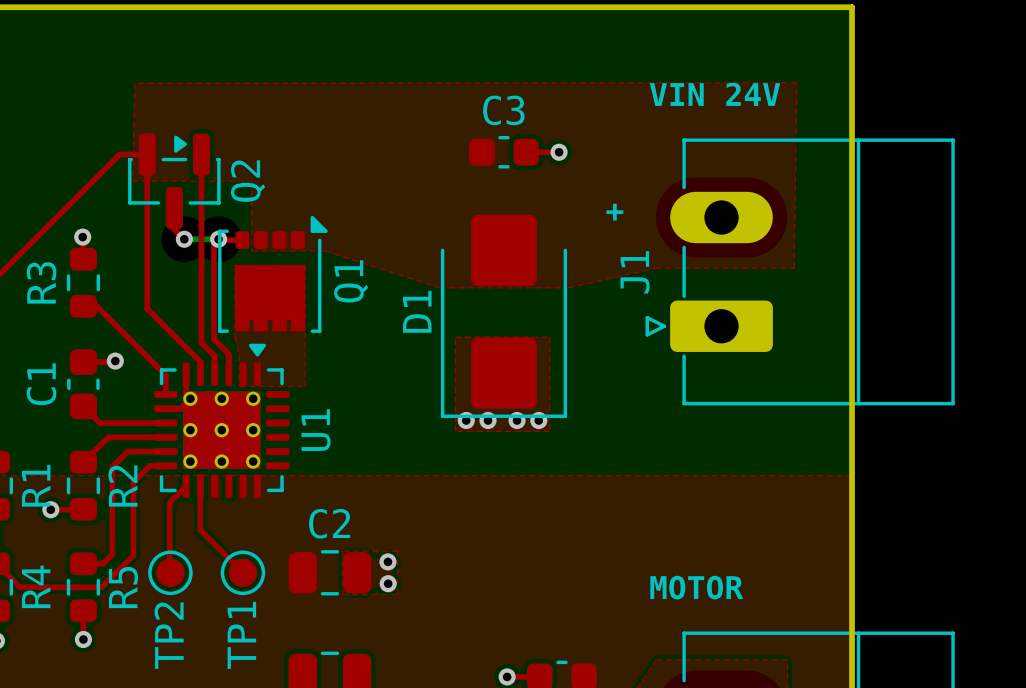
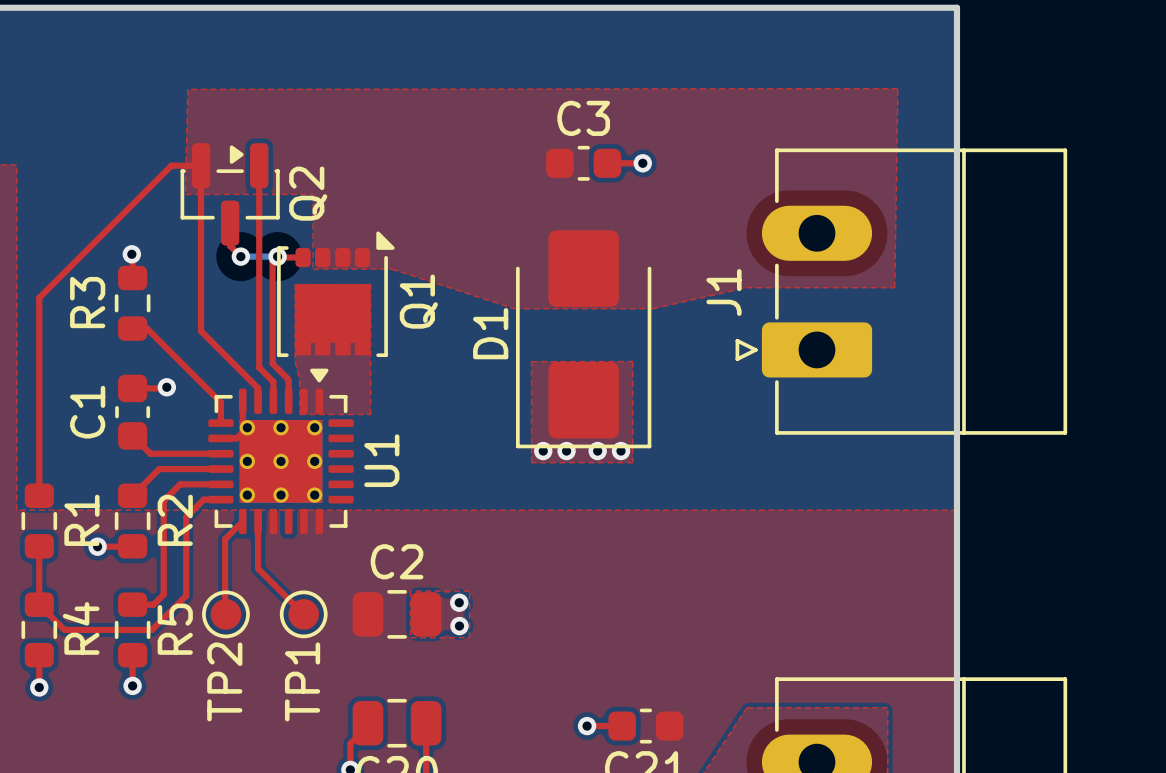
text: VIN 24V (715, 94) -> none
text: + (614, 212) -> none
text: MOTOR (696, 587) -> none

